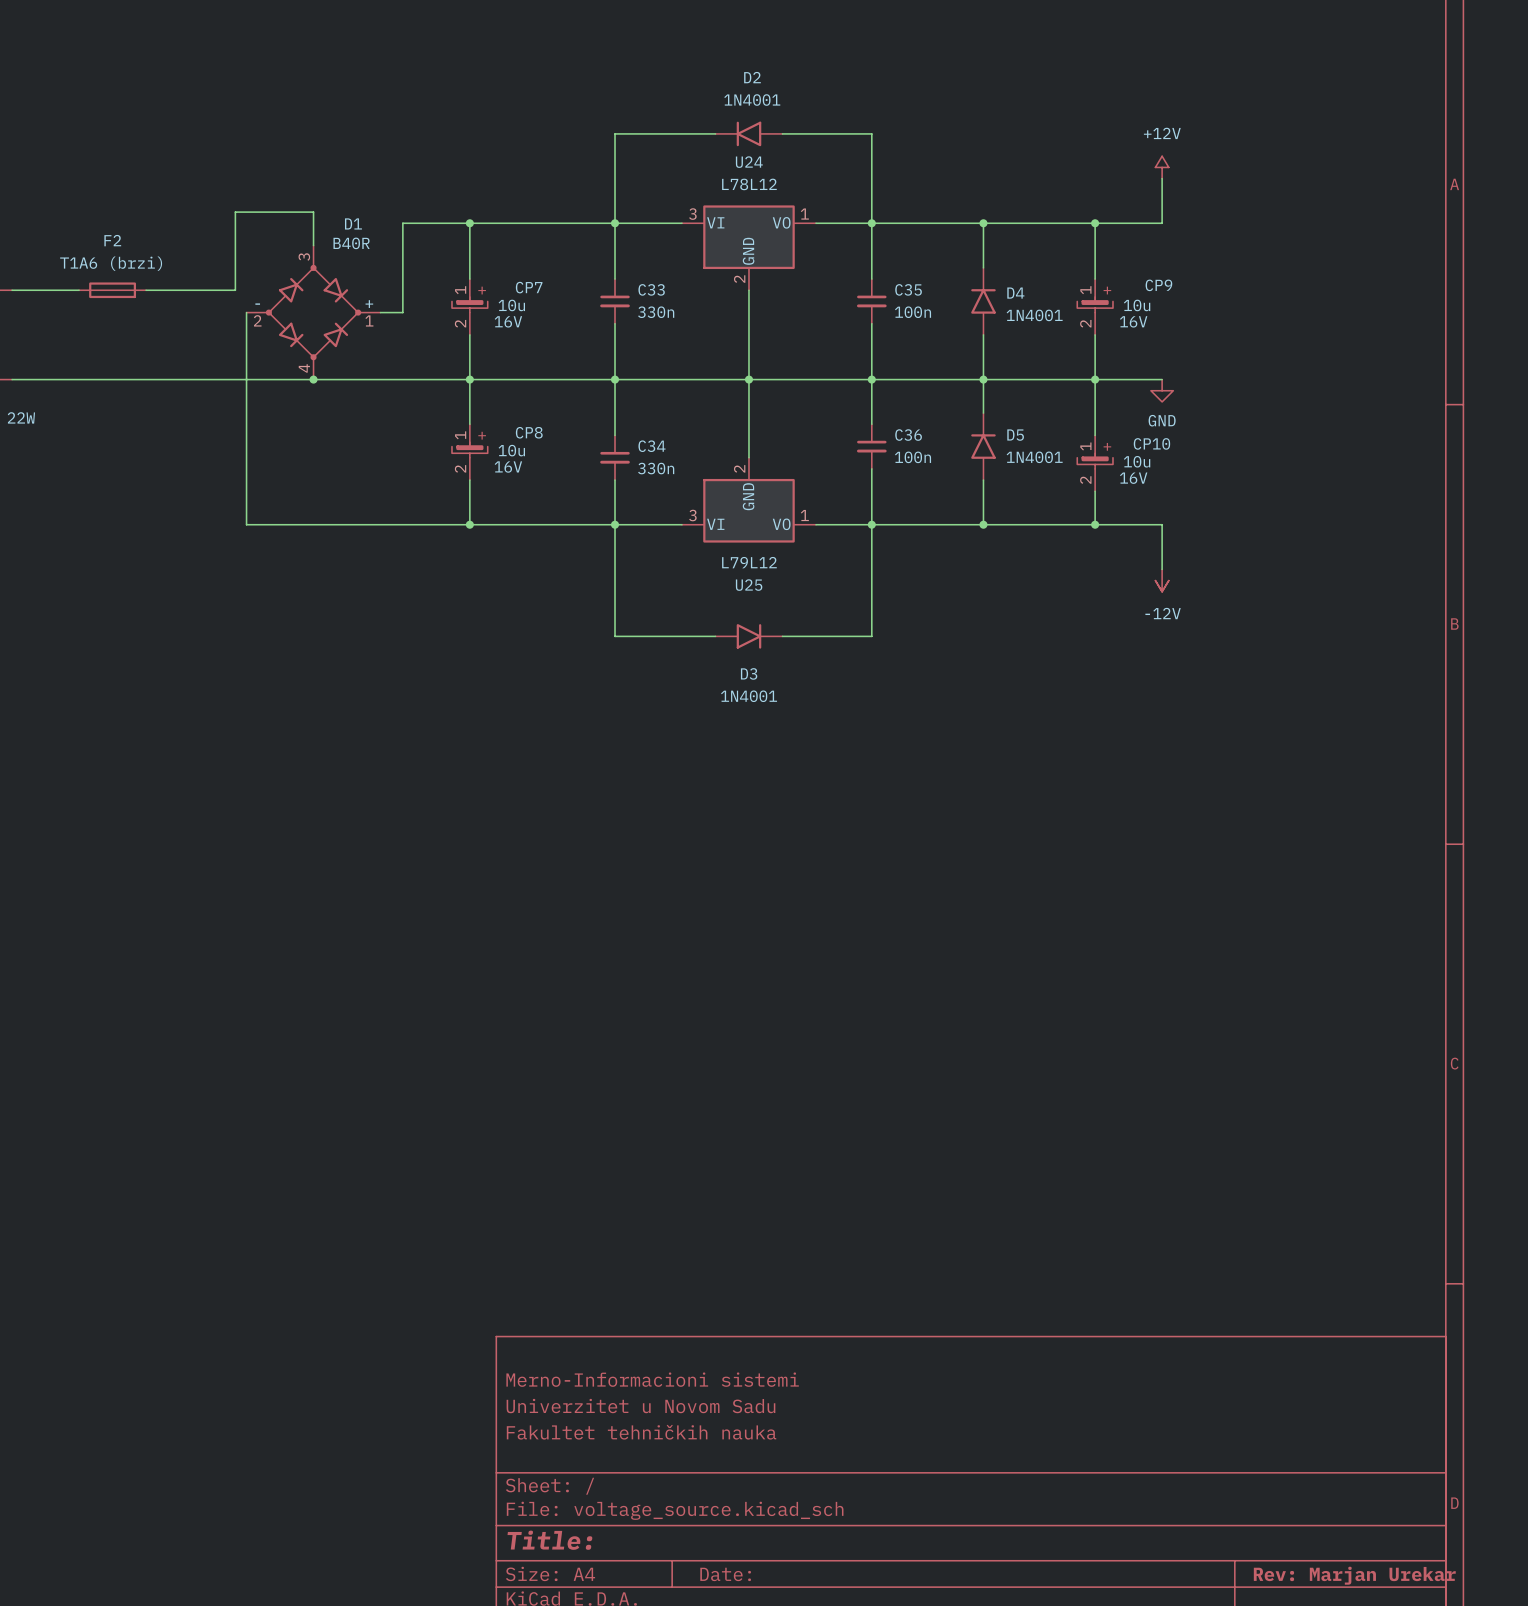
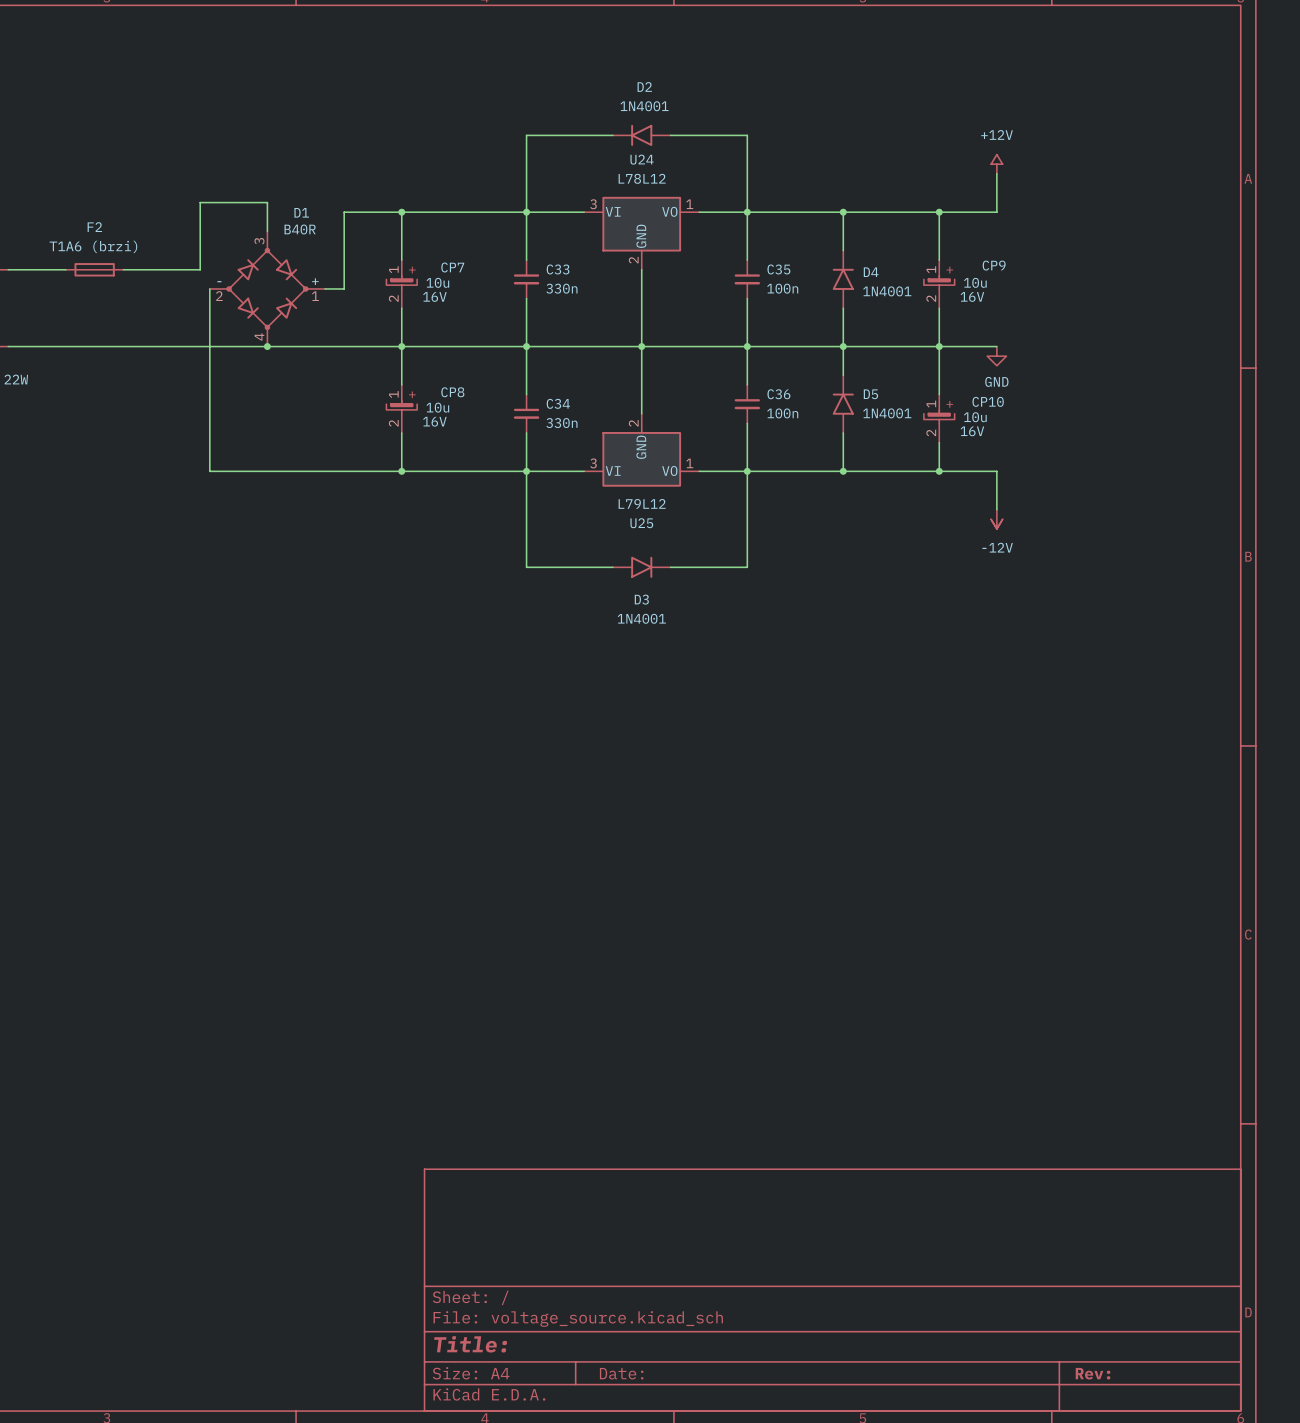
title block: Merno-Informacioni sistemi (652, 1379) -> none
title block: Univerzitet u Novom Sadu (640, 1406) -> none
title block: Fakultet tehničkih nauka (641, 1432) -> none
title block: Rev: Marjan Urekar (1354, 1575) -> Rev: (1093, 1373)

